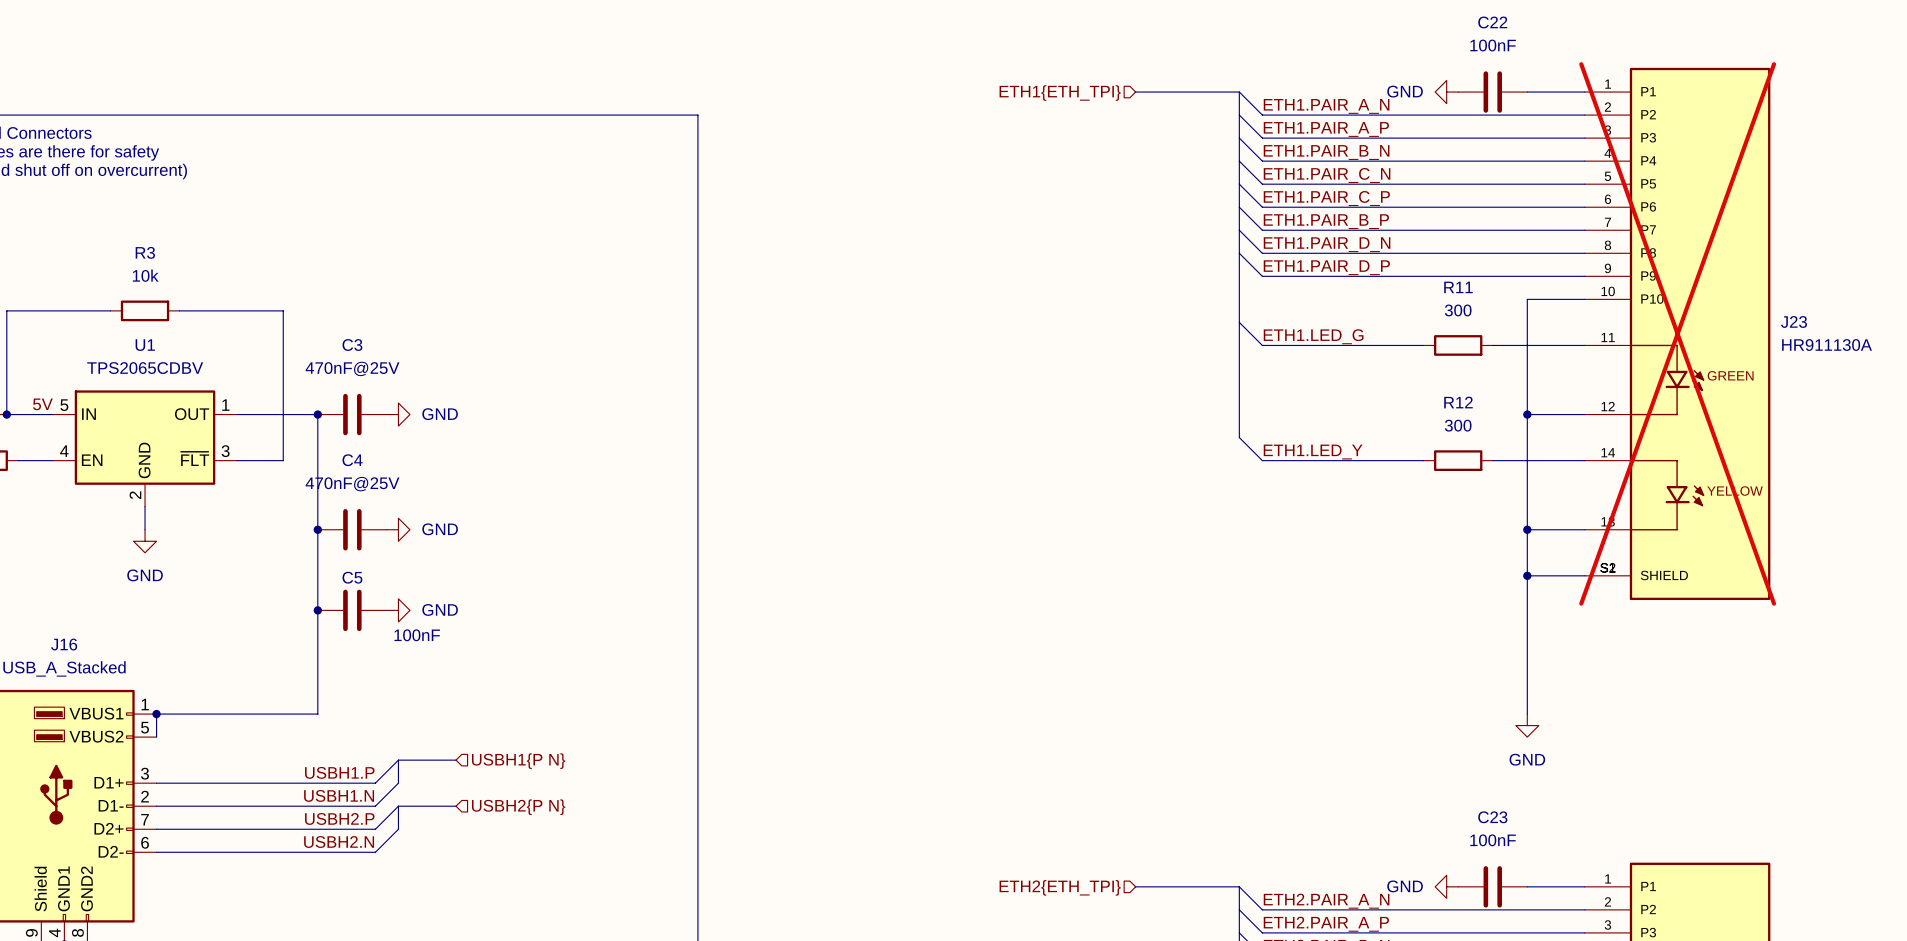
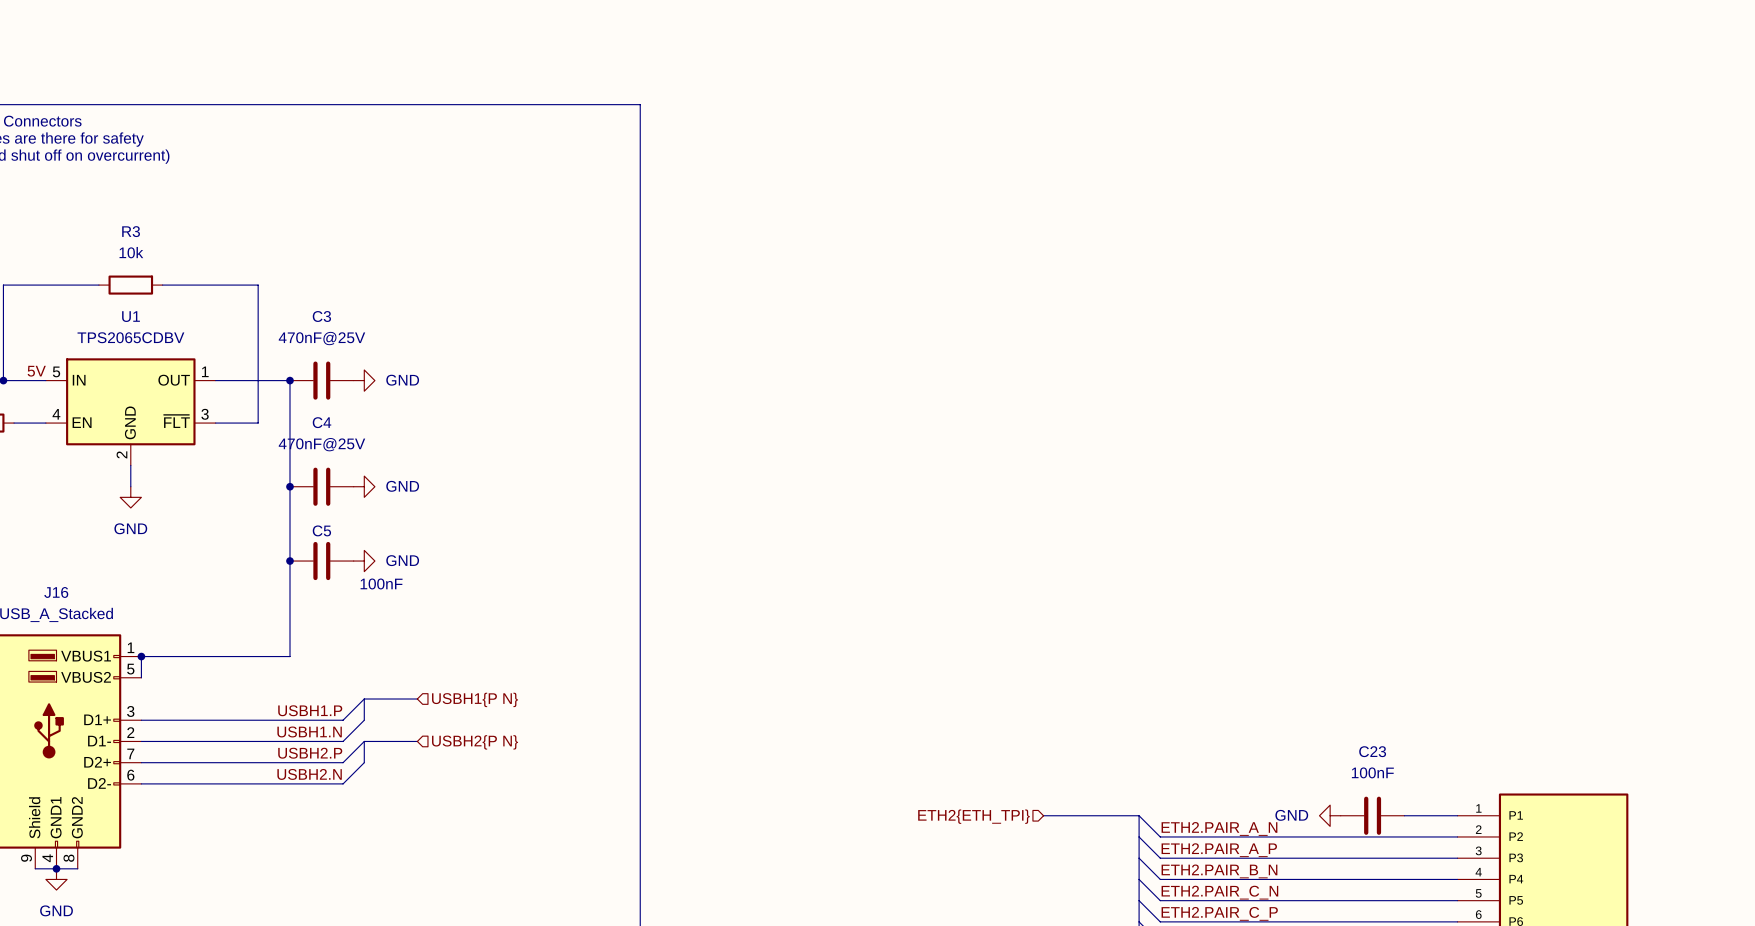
bus: (1135, 92) (1239, 92) (1239, 437) -> none
wire: (1239, 92) (1262, 115) (1584, 115) -> none
power symbol: GND (1446, 92) -> none
C22: 100nF (1492, 92) -> none
wire: (1527, 92) (1584, 92) -> none
hierarchical label: ETH1{ETH_TPI} (1060, 93) -> none
label: ETH1.PAIR_A_N (1326, 106) -> none
wire: (1239, 115) (1262, 138) (1584, 138) -> none
label: ETH1.PAIR_A_P (1326, 129) -> none
wire: (1239, 138) (1262, 161) (1584, 161) -> none
label: ETH1.PAIR_B_N (1326, 152) -> none
wire: (1239, 161) (1262, 184) (1584, 184) -> none
label: ETH1.PAIR_C_N (1327, 175) -> none
wire: (1239, 184) (1262, 207) (1584, 207) -> none
label: ETH1.PAIR_C_P (1326, 198) -> none
wire: (1239, 207) (1262, 230) (1584, 230) -> none
label: ETH1.PAIR_B_P (1326, 221) -> none
wire: (1239, 230) (1262, 253) (1584, 253) -> none
label: ETH1.PAIR_D_N (1327, 244) -> none
wire: (1239, 253) (1262, 276) (1584, 276) -> none
label: ETH1.PAIR_D_P (1326, 267) -> none
wire: (1584, 299) (1527, 299) (1527, 714) -> none
wire: (1239, 322) (1262, 345) (1423, 345) -> none
J23: HR911130A (1677, 333) -> none
label: ETH1.LED_G (1313, 336) -> none
R11: 300 (1458, 345) -> none
wire: (1492, 345) (1584, 345) -> none
wire: (1527, 414) (1584, 414) -> none
junction: (1527, 414) -> none
wire: (1239, 437) (1262, 460) (1423, 460) -> none
label: ETH1.LED_Y (1313, 452) -> none
R12: 300 (1458, 460) -> none
wire: (1492, 460) (1584, 460) -> none
wire: (1527, 529) (1584, 529) -> none
junction: (1527, 529) -> none
wire: (1527, 575) (1584, 575) -> none
junction: (1527, 575) -> none
power symbol: GND (1527, 725) -> none

